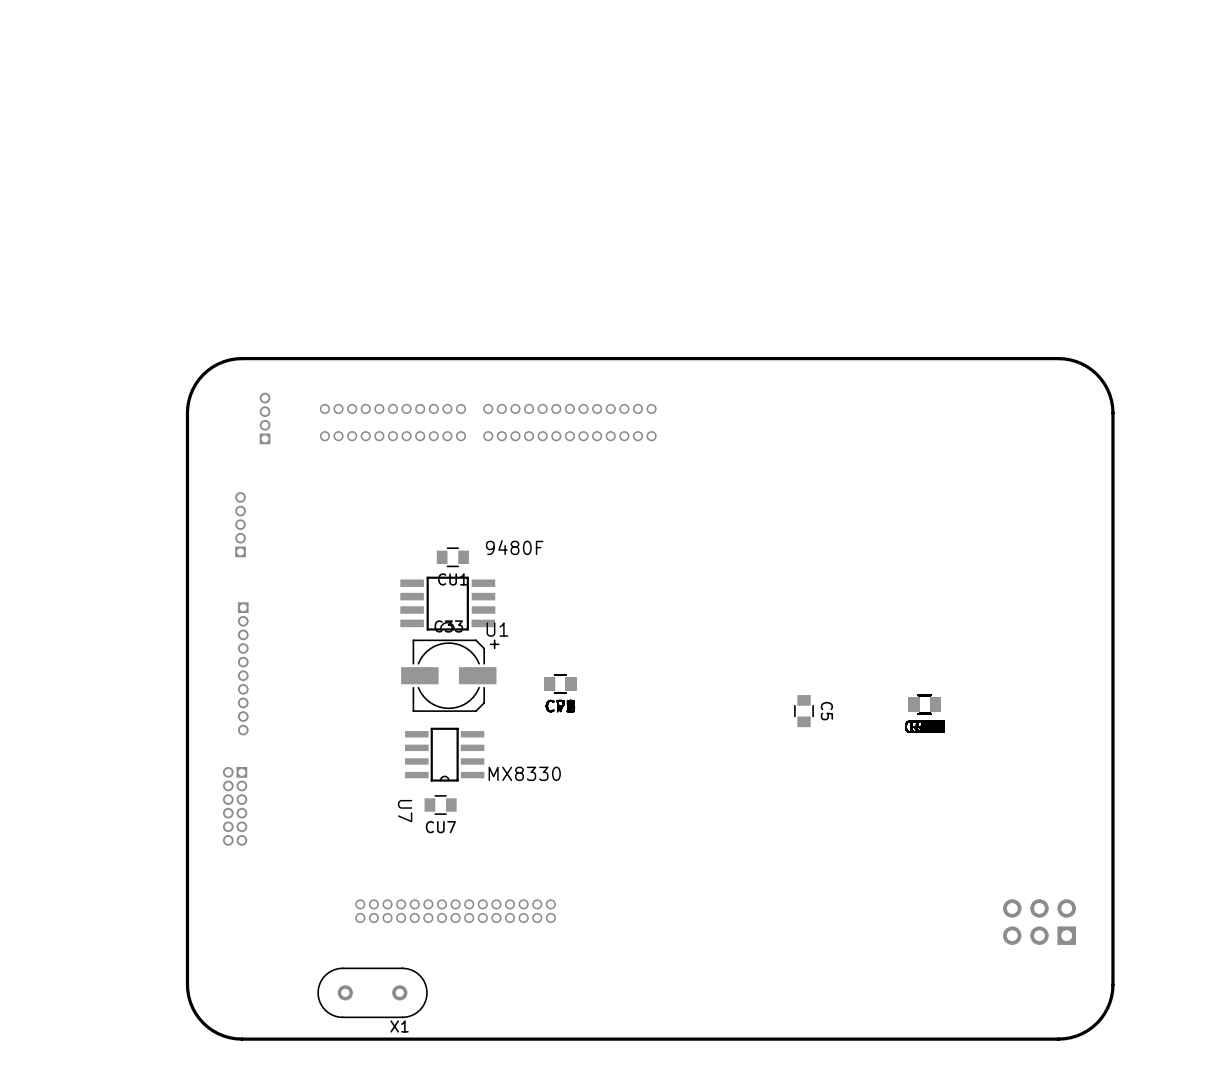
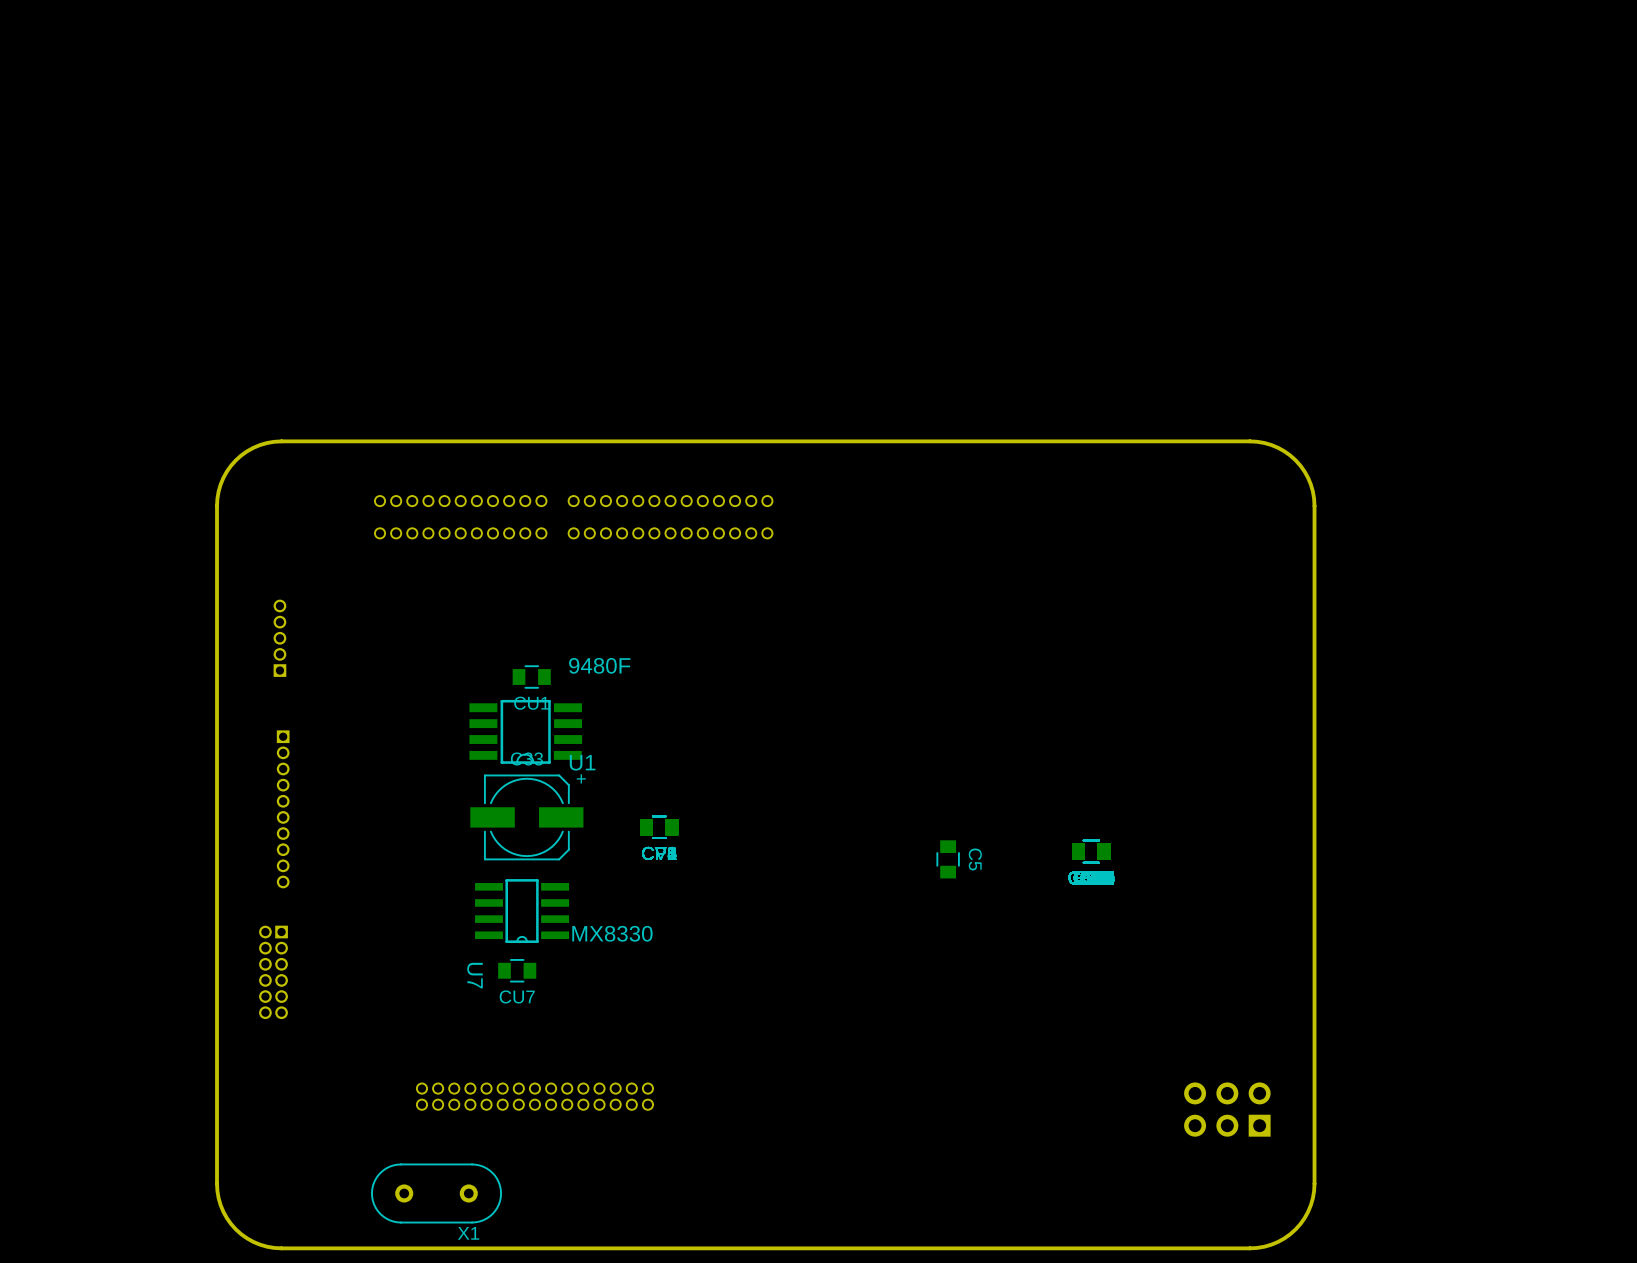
part: (265, 418) -> none

